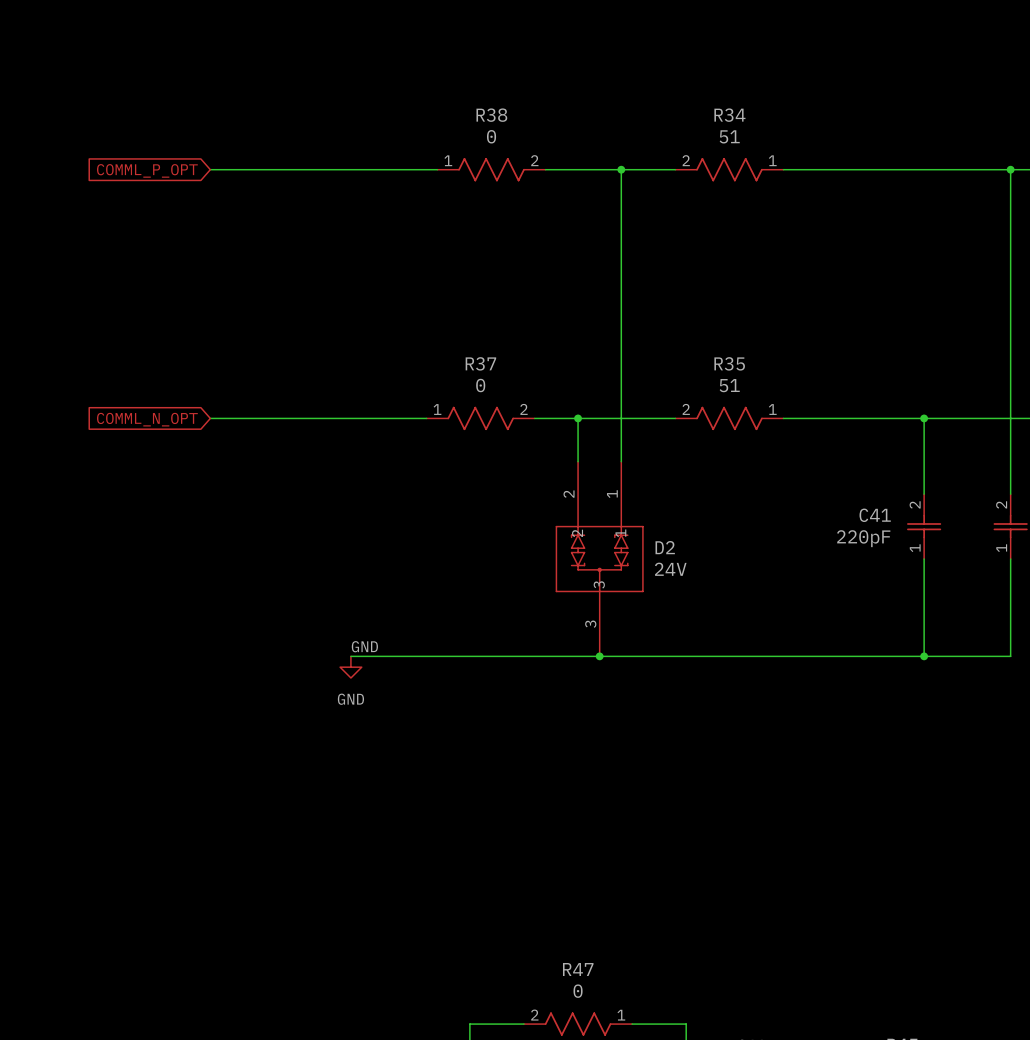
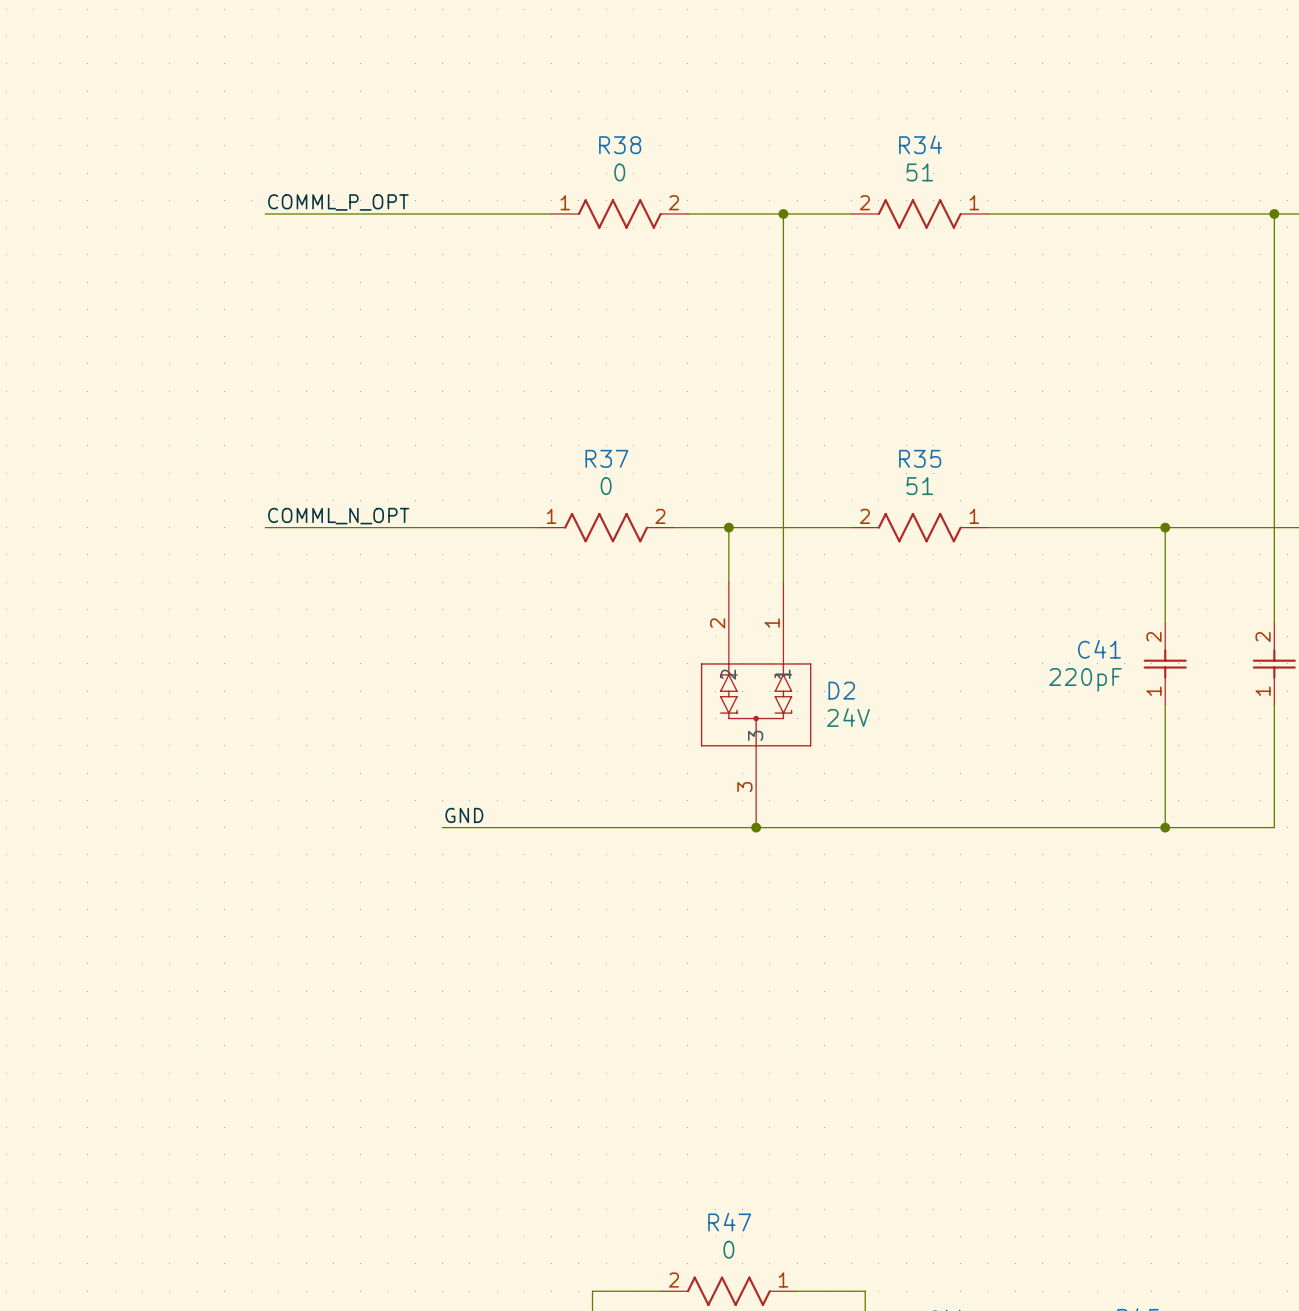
label: none -> COMML_P_OPT (338, 202)
global label: COMML_P_OPT (147, 170) -> none
label: none -> COMML_N_OPT (338, 516)
global label: COMML_N_OPT (147, 419) -> none
power symbol: GND (350, 667) -> none

